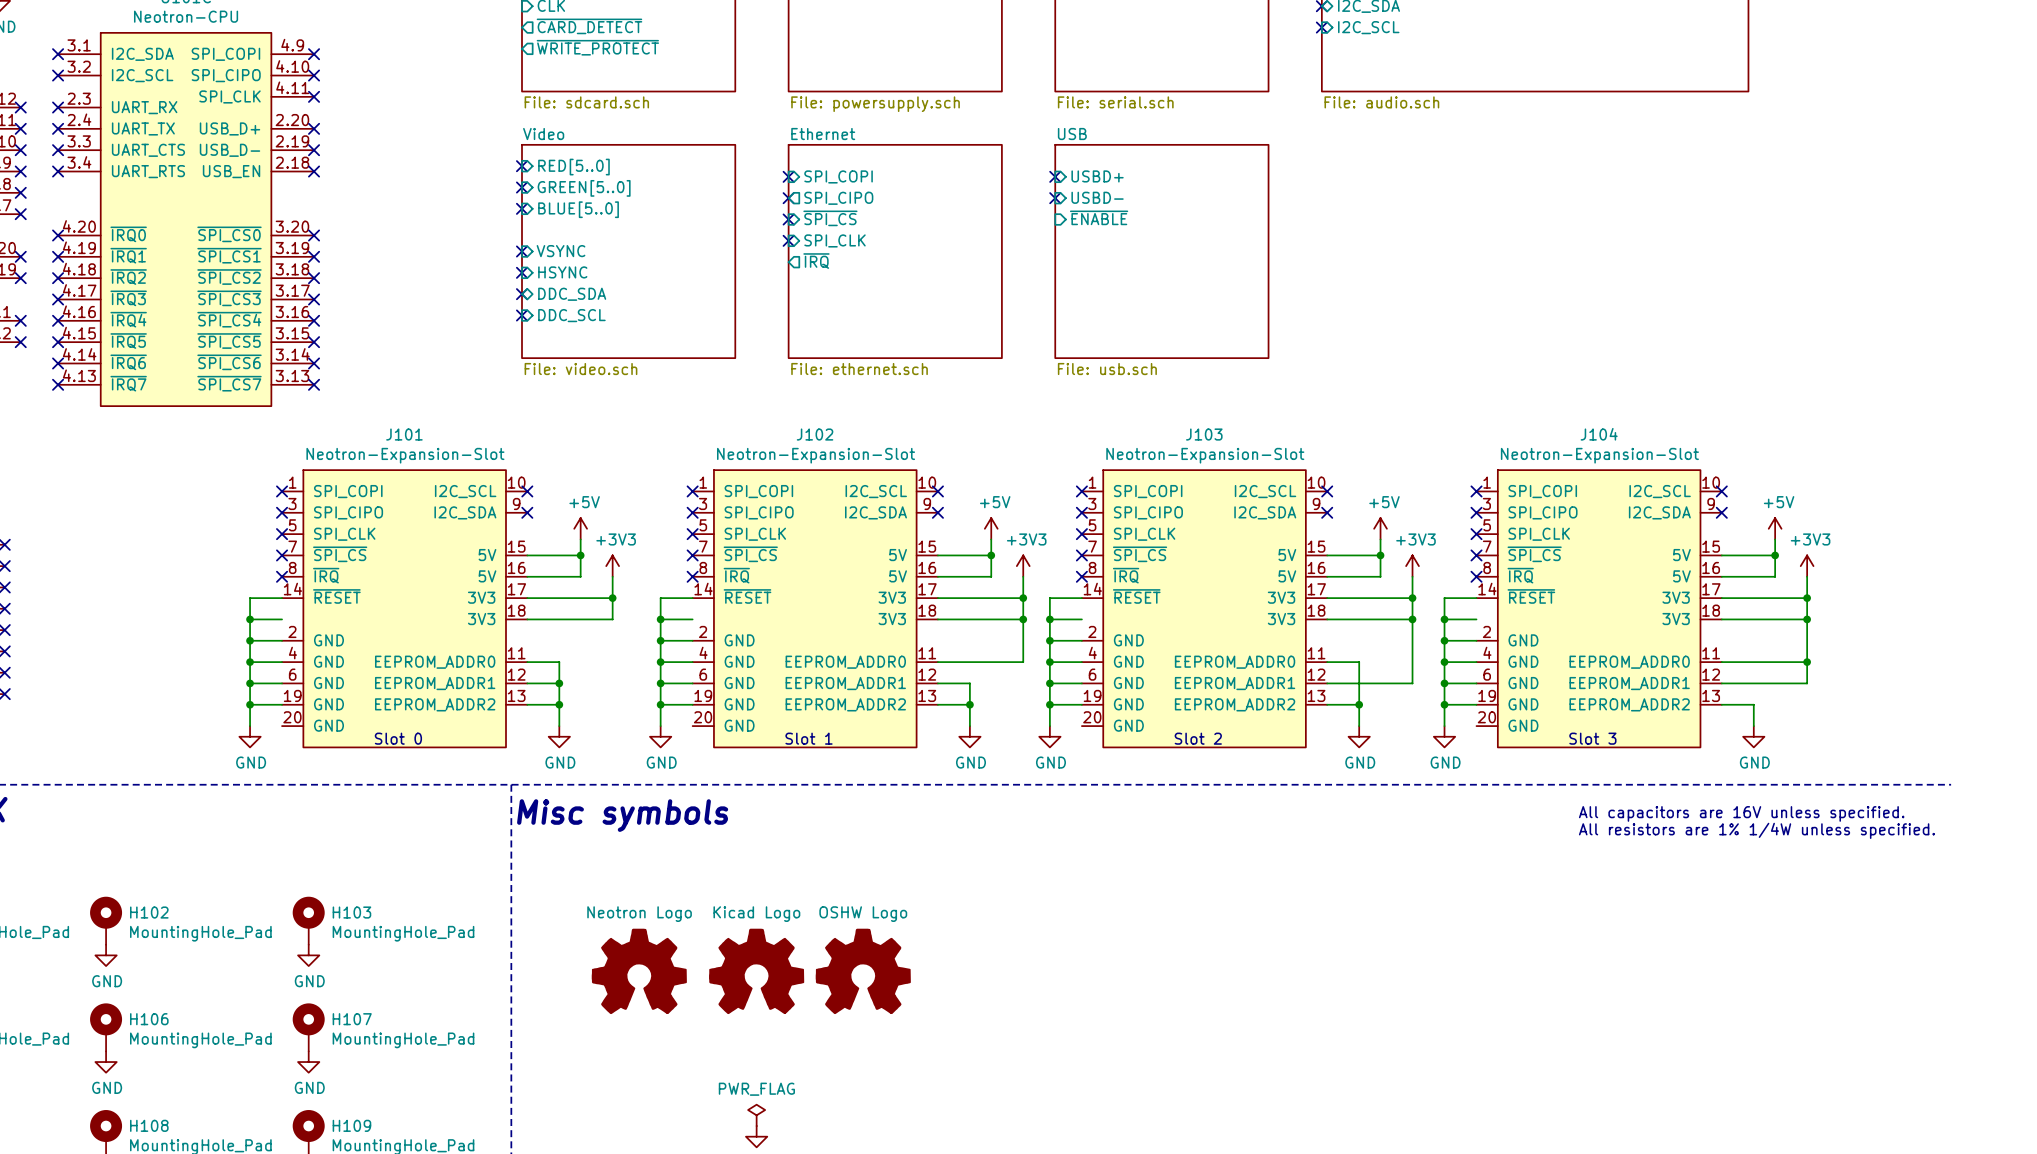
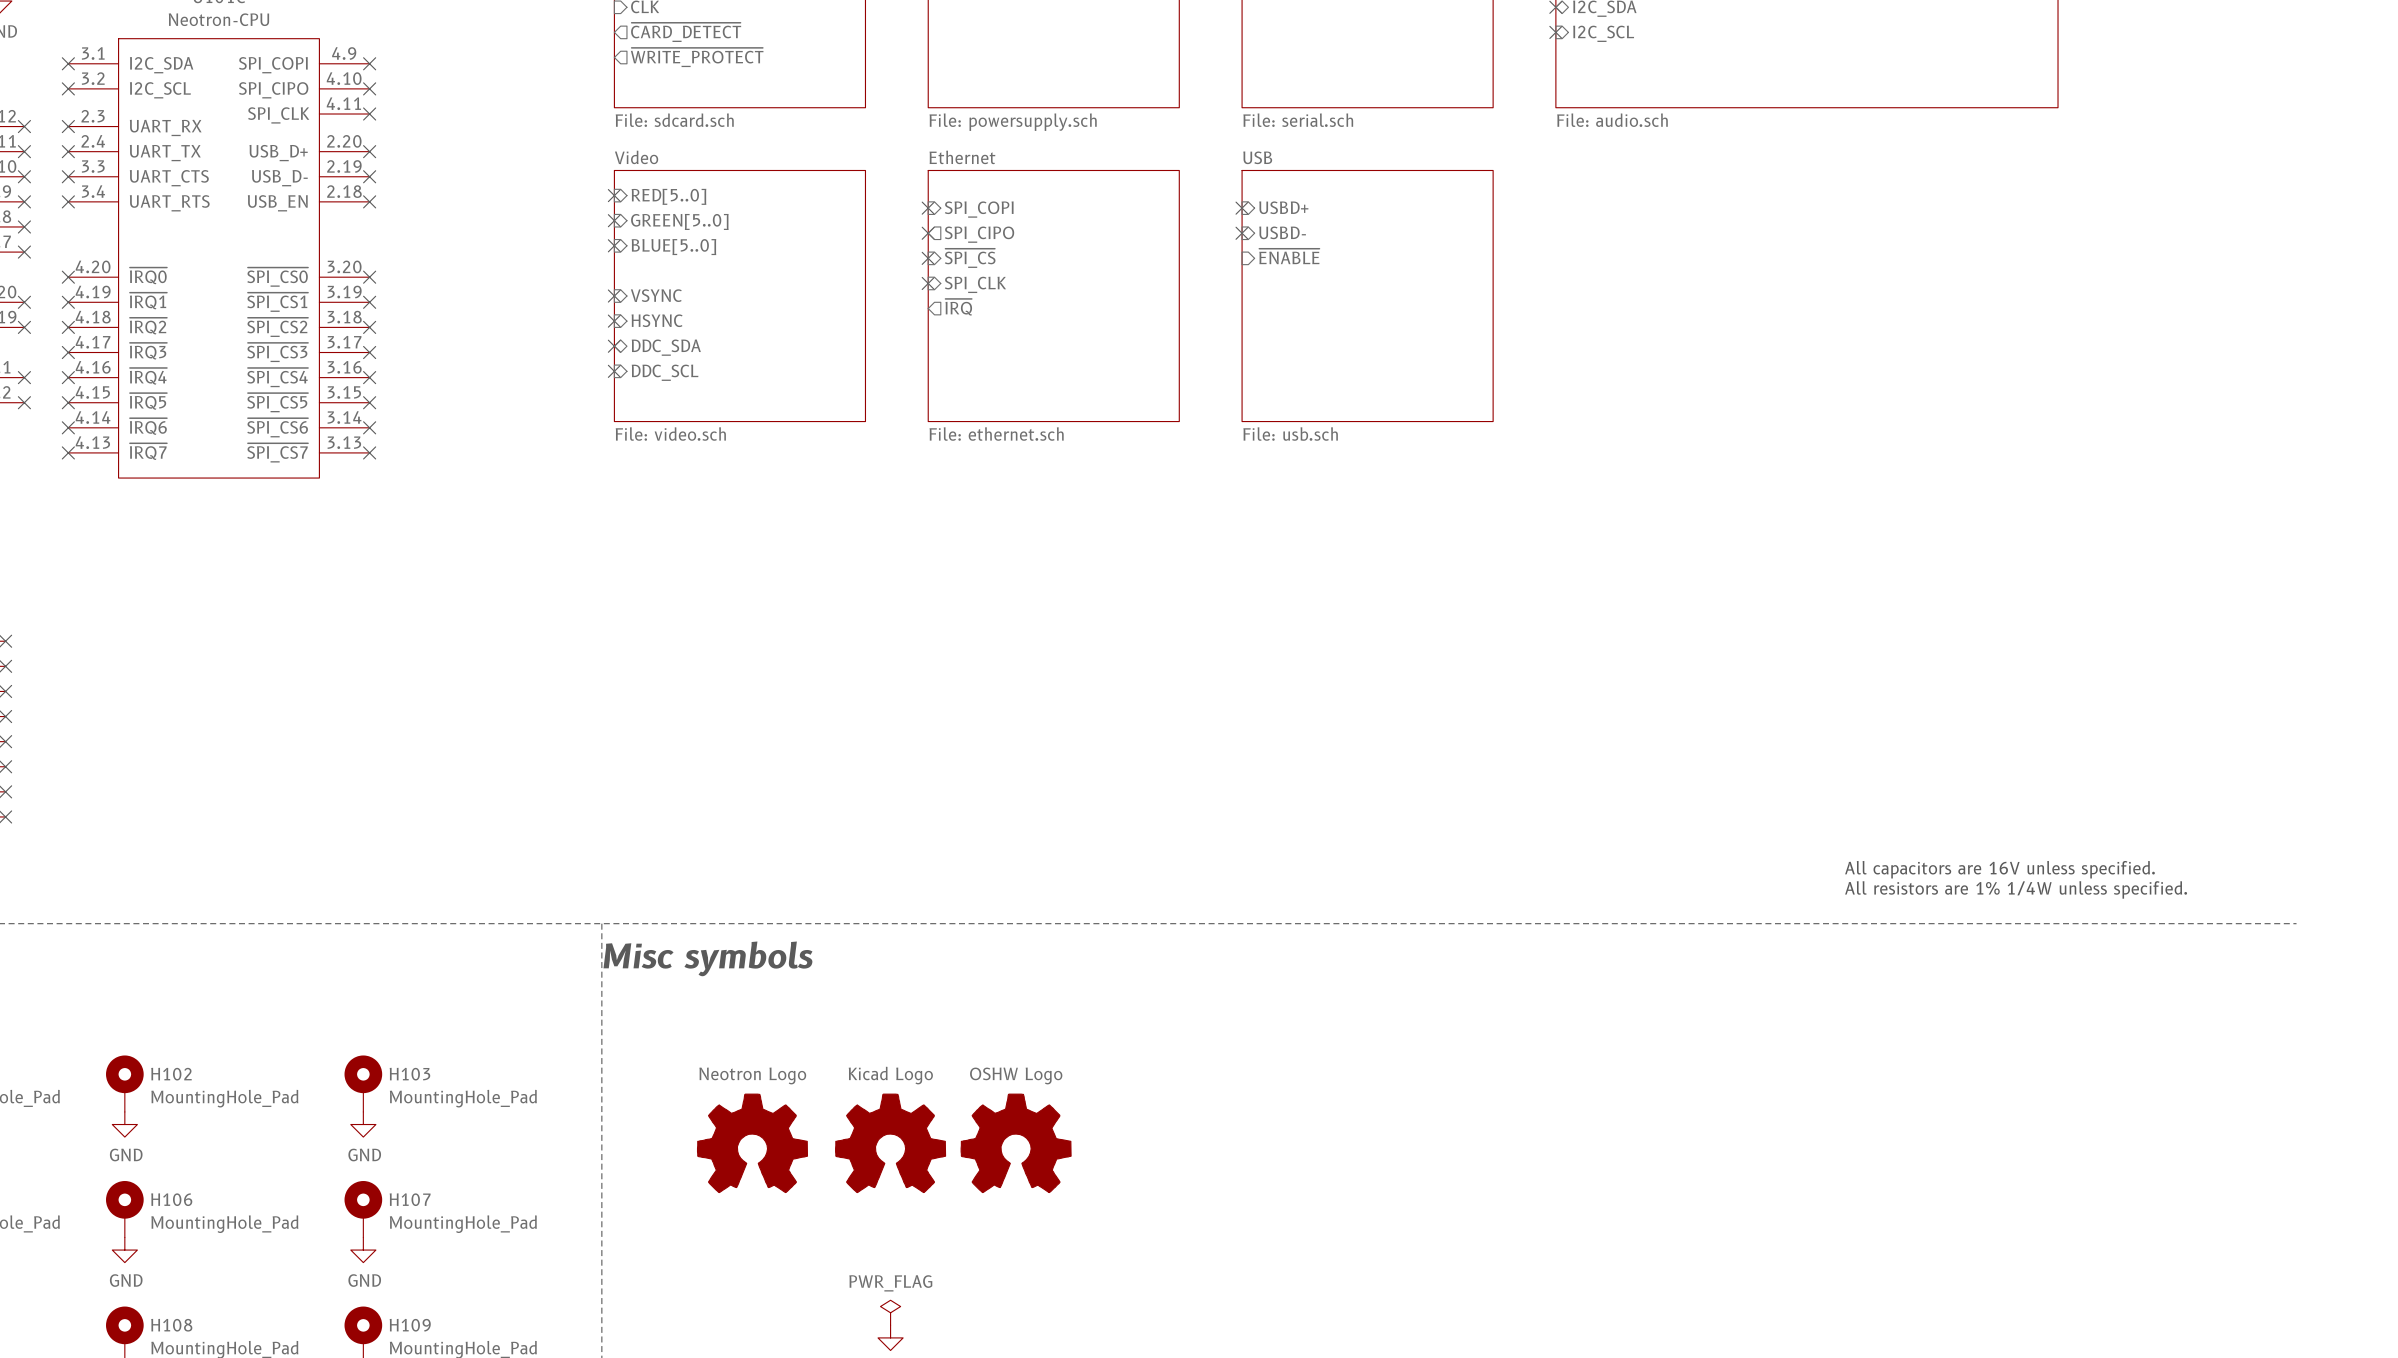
no-connect mark: (282, 491) -> none
no-connect mark: (527, 491) -> none
no-connect mark: (692, 491) -> none
no-connect mark: (937, 491) -> none
no-connect mark: (1081, 491) -> none
no-connect mark: (1327, 491) -> none
no-connect mark: (1476, 491) -> none
no-connect mark: (1721, 491) -> none
no-connect mark: (282, 512) -> none
no-connect mark: (527, 512) -> none
no-connect mark: (692, 512) -> none
no-connect mark: (937, 512) -> none
no-connect mark: (1081, 512) -> none
no-connect mark: (1327, 512) -> none
no-connect mark: (1476, 512) -> none
no-connect mark: (1721, 512) -> none
power symbol: +5V (580, 528) -> none
power symbol: +5V (991, 528) -> none
power symbol: +5V (1380, 528) -> none
power symbol: +5V (1775, 528) -> none
no-connect mark: (282, 534) -> none
no-connect mark: (692, 534) -> none
no-connect mark: (1081, 534) -> none
no-connect mark: (1476, 534) -> none
wire: (580, 539) (580, 576) (527, 576) -> none
wire: (991, 539) (991, 576) (937, 576) -> none
wire: (1380, 539) (1380, 576) (1327, 576) -> none
wire: (1775, 539) (1775, 576) (1721, 576) -> none
no-connect mark: (282, 555) -> none
wire: (527, 555) (580, 555) -> none
junction: (580, 555) -> none
no-connect mark: (692, 555) -> none
wire: (937, 555) (991, 555) -> none
junction: (991, 555) -> none
no-connect mark: (1081, 555) -> none
wire: (1327, 555) (1380, 555) -> none
junction: (1380, 555) -> none
no-connect mark: (1476, 555) -> none
wire: (1721, 555) (1775, 555) -> none
junction: (1775, 555) -> none
power symbol: +3V3 (612, 566) -> none
power symbol: +3V3 (1023, 566) -> none
power symbol: +3V3 (1412, 566) -> none
power symbol: +3V3 (1807, 566) -> none
no-connect mark: (282, 576) -> none
wire: (612, 576) (612, 619) (527, 619) -> none
no-connect mark: (692, 576) -> none
wire: (1023, 576) (1023, 662) (937, 662) -> none
no-connect mark: (1081, 576) -> none
wire: (1412, 576) (1412, 683) (1327, 683) -> none
no-connect mark: (1476, 576) -> none
wire: (1807, 576) (1807, 683) (1721, 683) -> none
wire: (282, 598) (250, 598) (250, 726) -> none
wire: (527, 598) (612, 598) -> none
junction: (612, 598) -> none
wire: (692, 598) (660, 598) (660, 726) -> none
wire: (937, 598) (1023, 598) -> none
junction: (1023, 598) -> none
wire: (1081, 598) (1049, 598) (1049, 726) -> none
wire: (1327, 598) (1412, 598) -> none
junction: (1412, 598) -> none
wire: (1476, 598) (1444, 598) (1444, 726) -> none
wire: (1721, 598) (1807, 598) -> none
junction: (1807, 598) -> none
J101: Neotron-Expansion-Slot (404, 608) -> none
J102: Neotron-Expansion-Slot (815, 608) -> none
J103: Neotron-Expansion-Slot (1204, 608) -> none
J104: Neotron-Expansion-Slot (1599, 608) -> none
wire: (250, 619) (282, 619) -> none
junction: (250, 619) -> none
wire: (660, 619) (692, 619) -> none
junction: (660, 619) -> none
wire: (937, 619) (1023, 619) -> none
junction: (1023, 619) -> none
wire: (1049, 619) (1081, 619) -> none
junction: (1049, 619) -> none
wire: (1327, 619) (1412, 619) -> none
junction: (1412, 619) -> none
wire: (1444, 619) (1476, 619) -> none
junction: (1444, 619) -> none
wire: (1721, 619) (1807, 619) -> none
junction: (1807, 619) -> none
wire: (250, 640) (282, 640) -> none
junction: (250, 640) -> none
wire: (660, 640) (692, 640) -> none
junction: (660, 640) -> none
wire: (1049, 640) (1081, 640) -> none
junction: (1049, 640) -> none
wire: (1444, 640) (1476, 640) -> none
junction: (1444, 640) -> none
wire: (250, 662) (282, 662) -> none
junction: (250, 662) -> none
wire: (527, 662) (559, 662) (559, 726) -> none
wire: (660, 662) (692, 662) -> none
junction: (660, 662) -> none
wire: (1049, 662) (1081, 662) -> none
junction: (1049, 662) -> none
wire: (1327, 662) (1359, 662) (1359, 726) -> none
wire: (1444, 662) (1476, 662) -> none
junction: (1444, 662) -> none
wire: (1721, 662) (1807, 662) -> none
junction: (1807, 662) -> none
wire: (250, 683) (282, 683) -> none
junction: (250, 683) -> none
wire: (527, 683) (559, 683) -> none
junction: (559, 683) -> none
wire: (660, 683) (692, 683) -> none
junction: (660, 683) -> none
wire: (937, 683) (969, 683) (969, 726) -> none
wire: (1049, 683) (1081, 683) -> none
junction: (1049, 683) -> none
wire: (1444, 683) (1476, 683) -> none
junction: (1444, 683) -> none
wire: (250, 704) (282, 704) -> none
junction: (250, 704) -> none
wire: (527, 704) (559, 704) -> none
junction: (559, 704) -> none
wire: (660, 704) (692, 704) -> none
junction: (660, 704) -> none
wire: (937, 704) (969, 704) -> none
junction: (969, 704) -> none
wire: (1049, 704) (1081, 704) -> none
junction: (1049, 704) -> none
wire: (1327, 704) (1359, 704) -> none
junction: (1359, 704) -> none
wire: (1444, 704) (1476, 704) -> none
junction: (1444, 704) -> none
wire: (1721, 704) (1753, 704) (1753, 726) -> none
power symbol: GND (250, 736) -> none
power symbol: GND (559, 736) -> none
power symbol: GND (660, 736) -> none
power symbol: GND (969, 736) -> none
power symbol: GND (1049, 736) -> none
power symbol: GND (1359, 736) -> none
power symbol: GND (1444, 736) -> none
power symbol: GND (1753, 736) -> none
text: Slot 0 (398, 738) -> none
text: Slot 1 (809, 738) -> none
text: Slot 2 (1198, 738) -> none
text: Slot 3 (1592, 738) -> none
text position: All capacitors are 16V unless specified. (1741, 813) -> All capacitors are 16V unless specified. (1999, 869)
text position: All resistors are 1% 1/4W unless specified. (1756, 830) -> All resistors are 1% 1/4W unless specified. (2016, 889)

